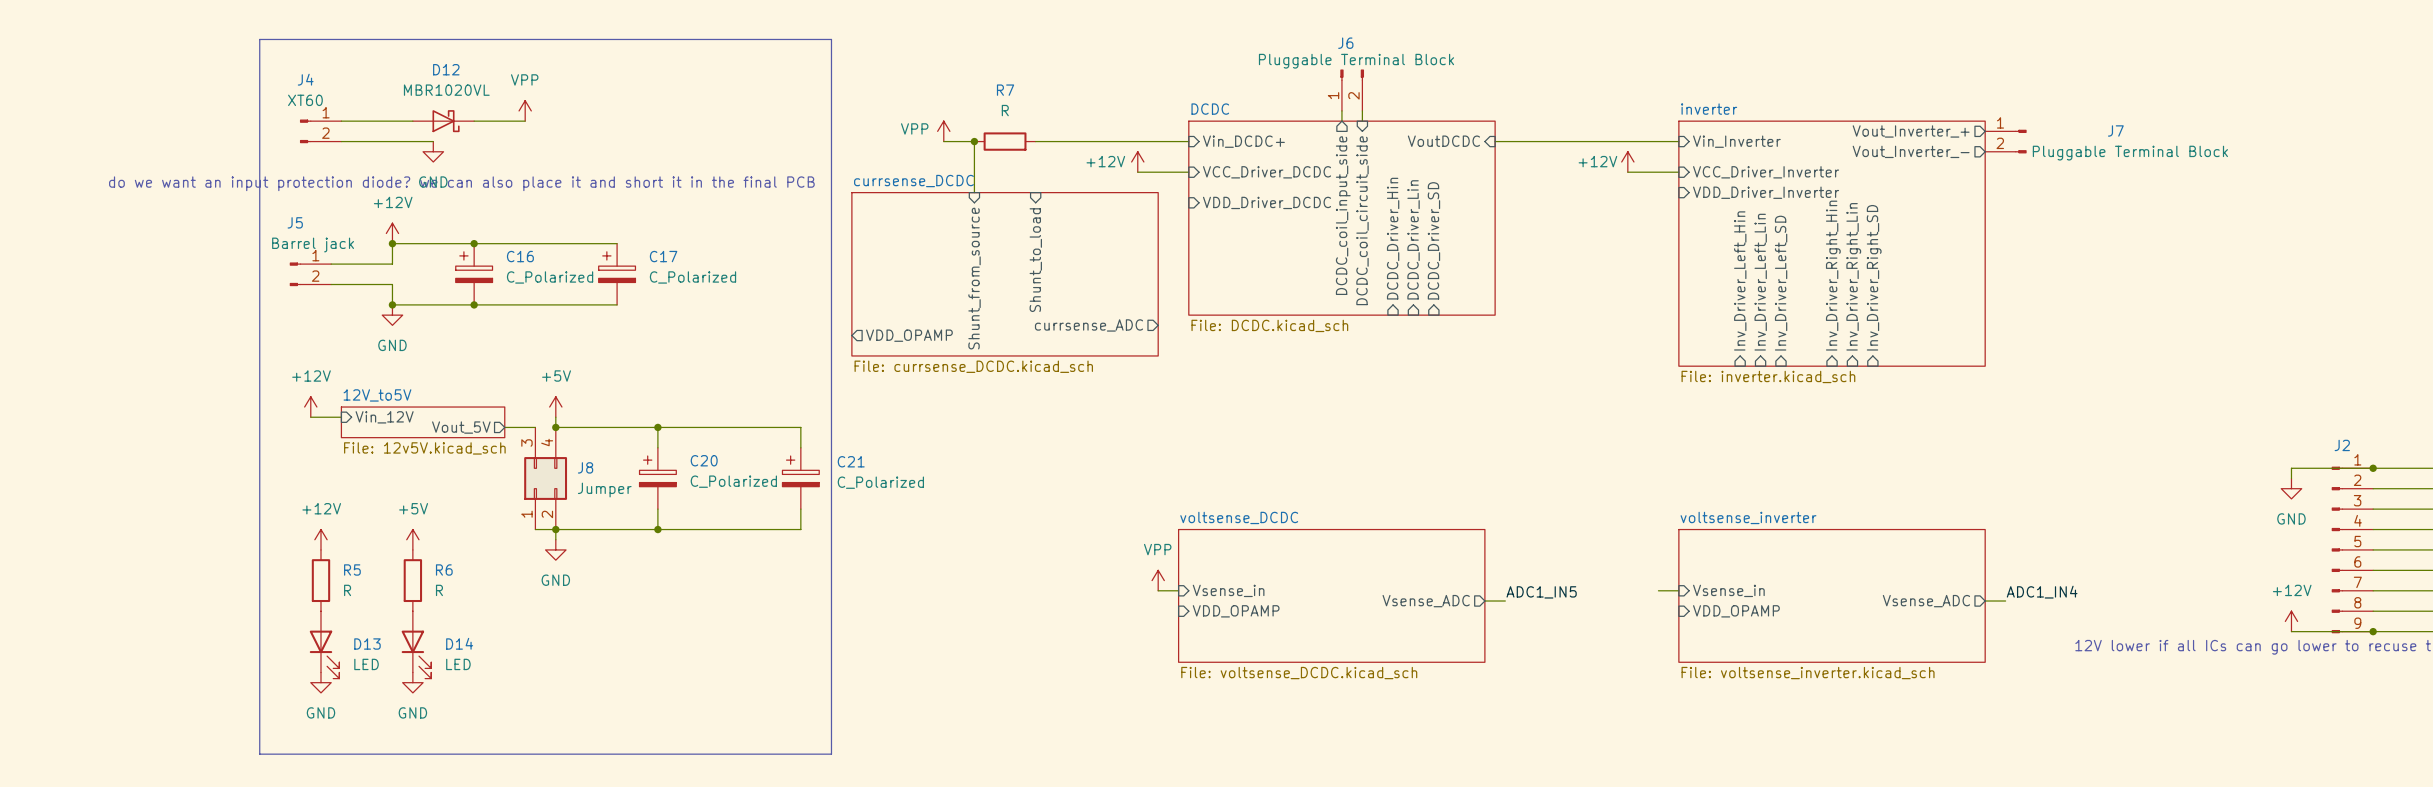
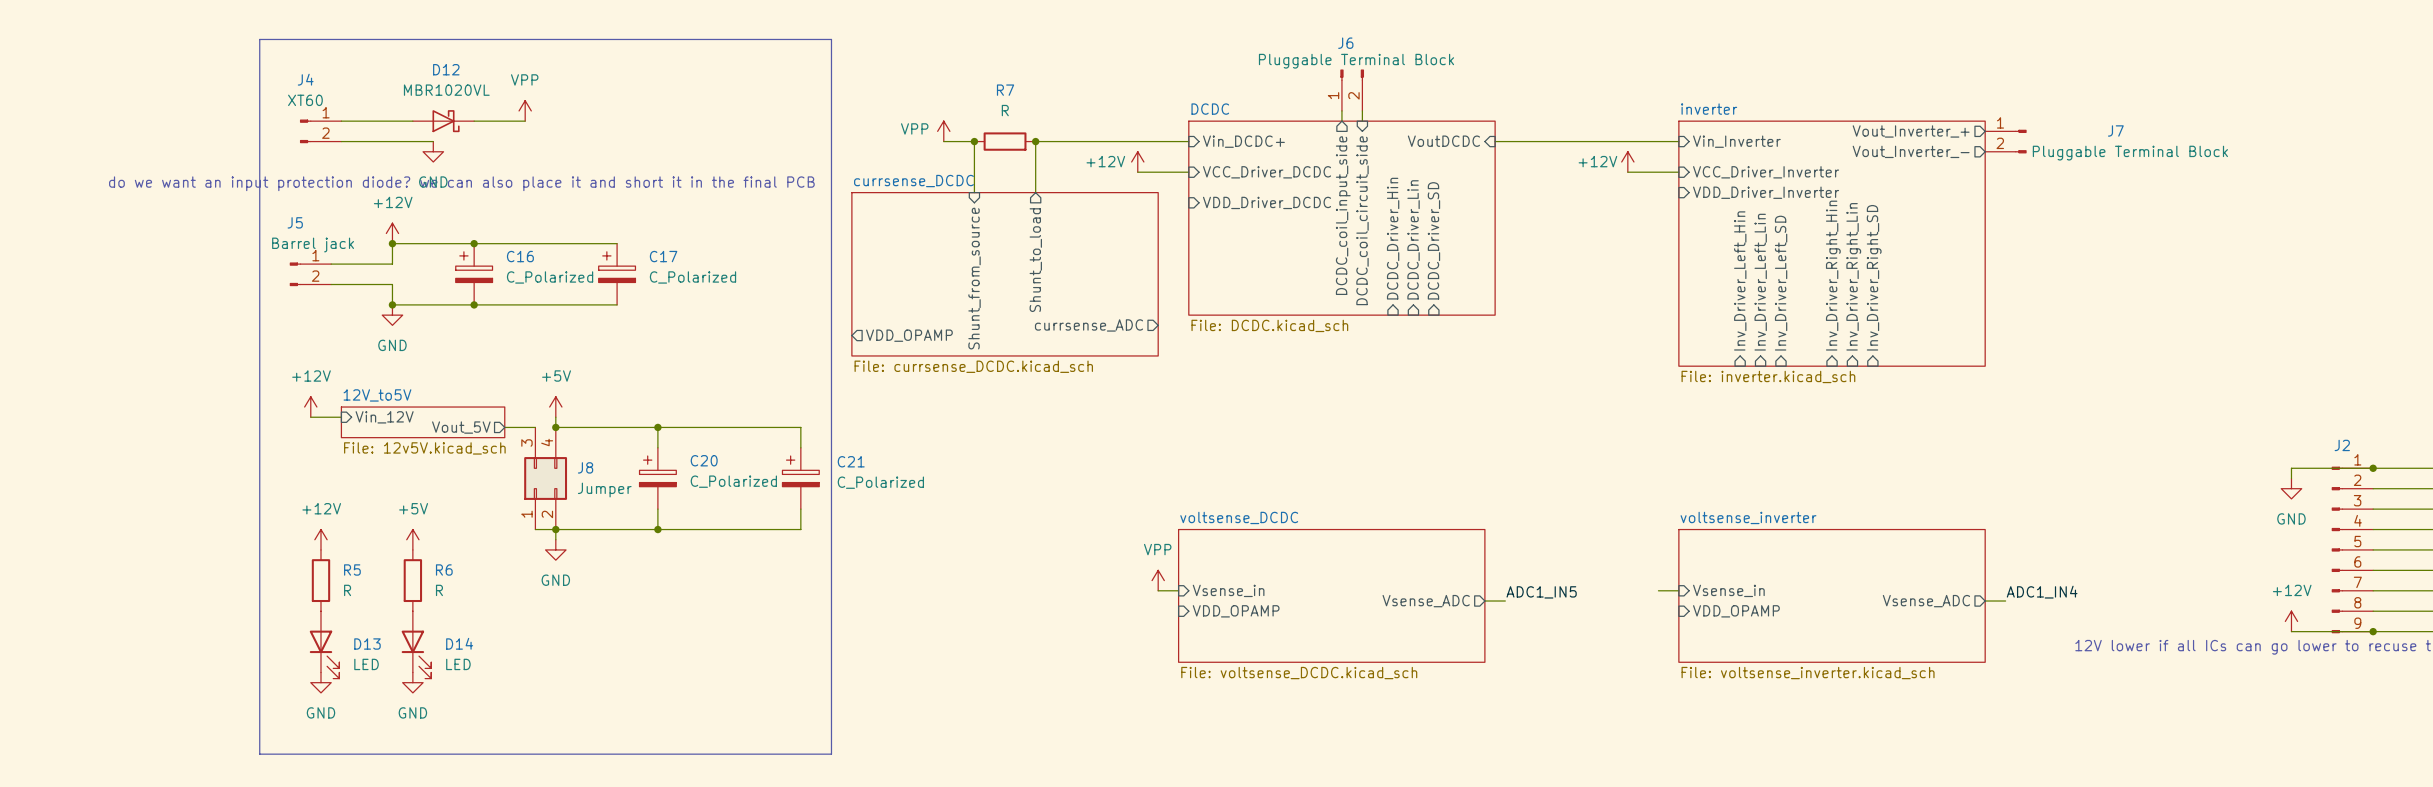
wire: none -> (1035, 141) (1035, 192)
junction: none -> (1035, 141)
sheet pin shape: input (1035, 260) -> output (1035, 260)

